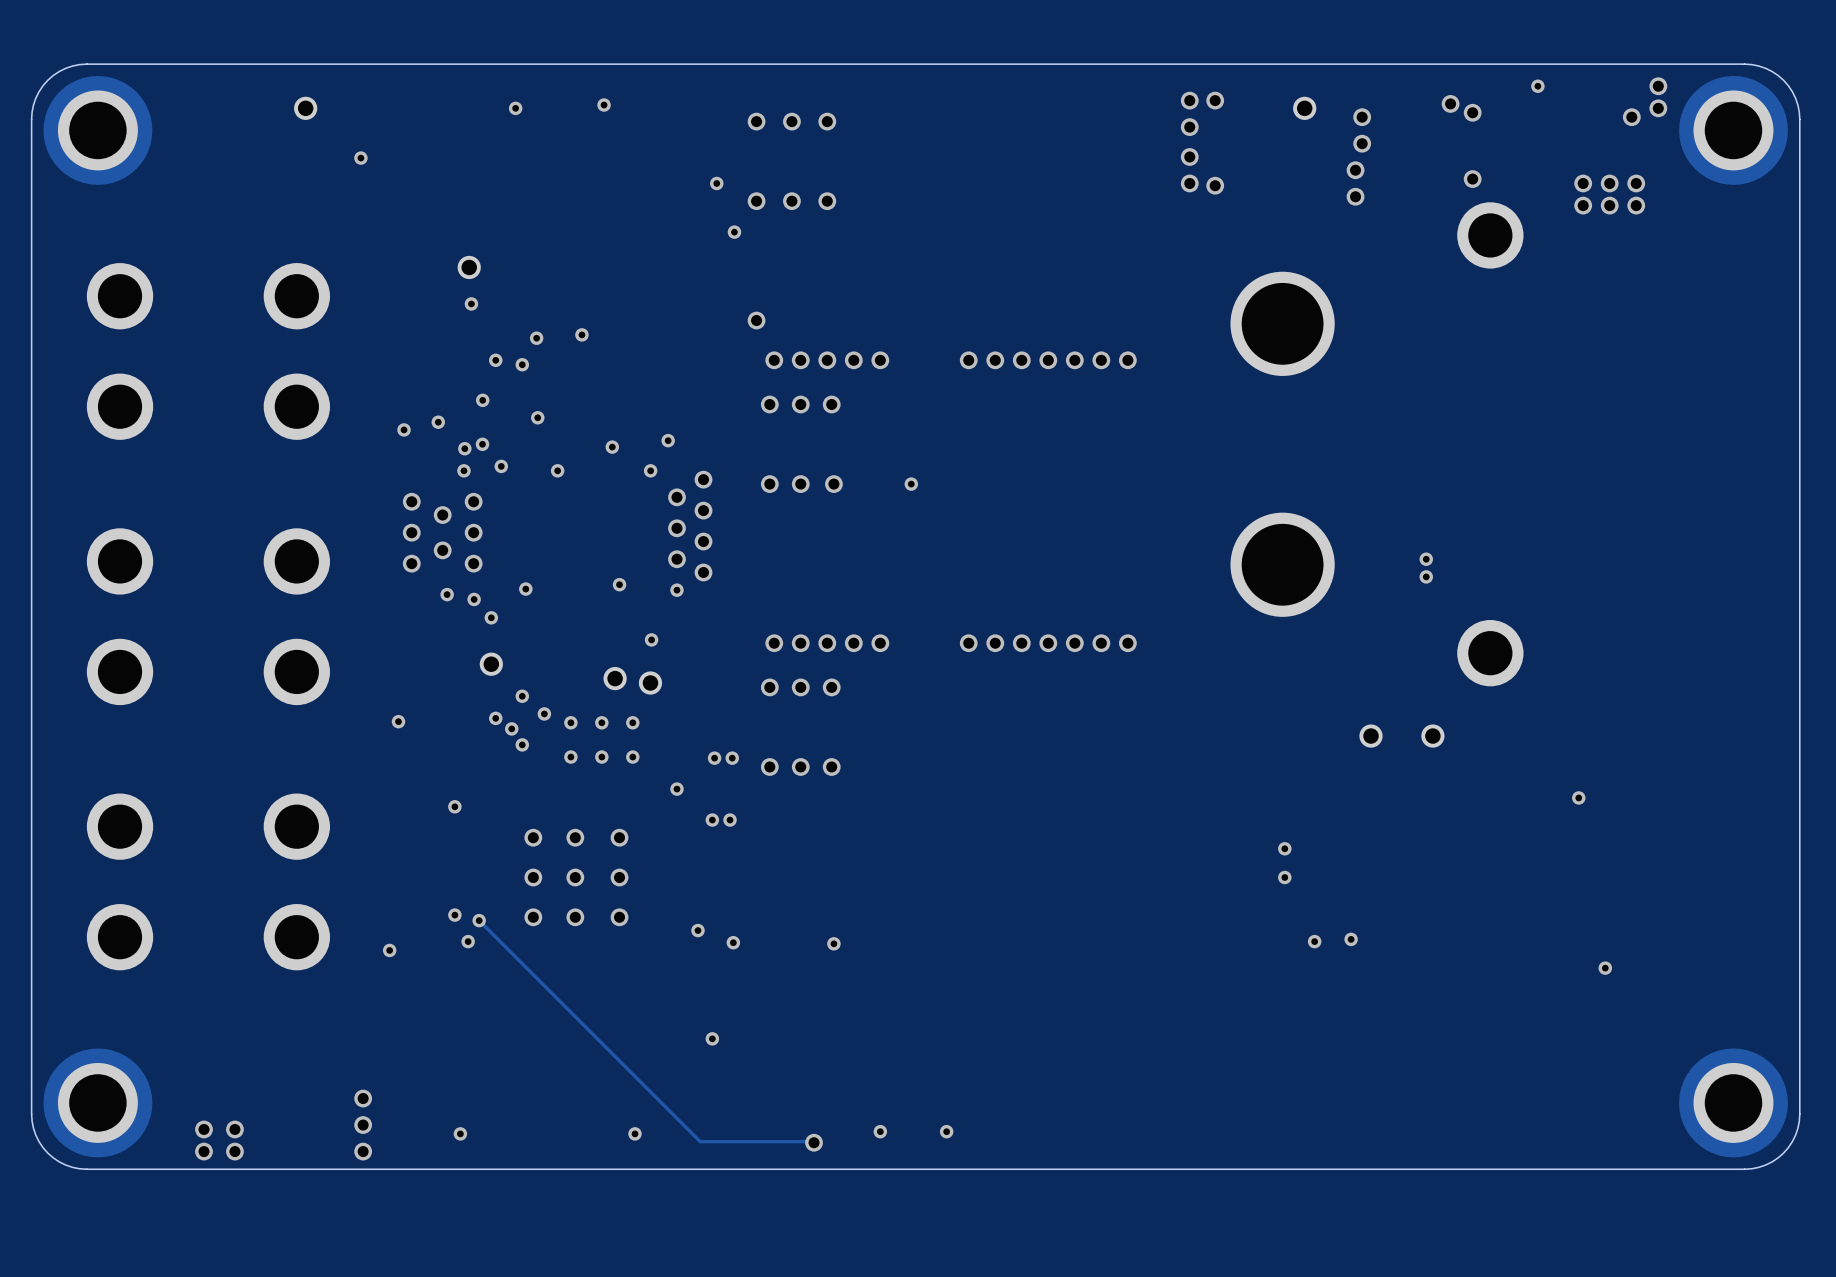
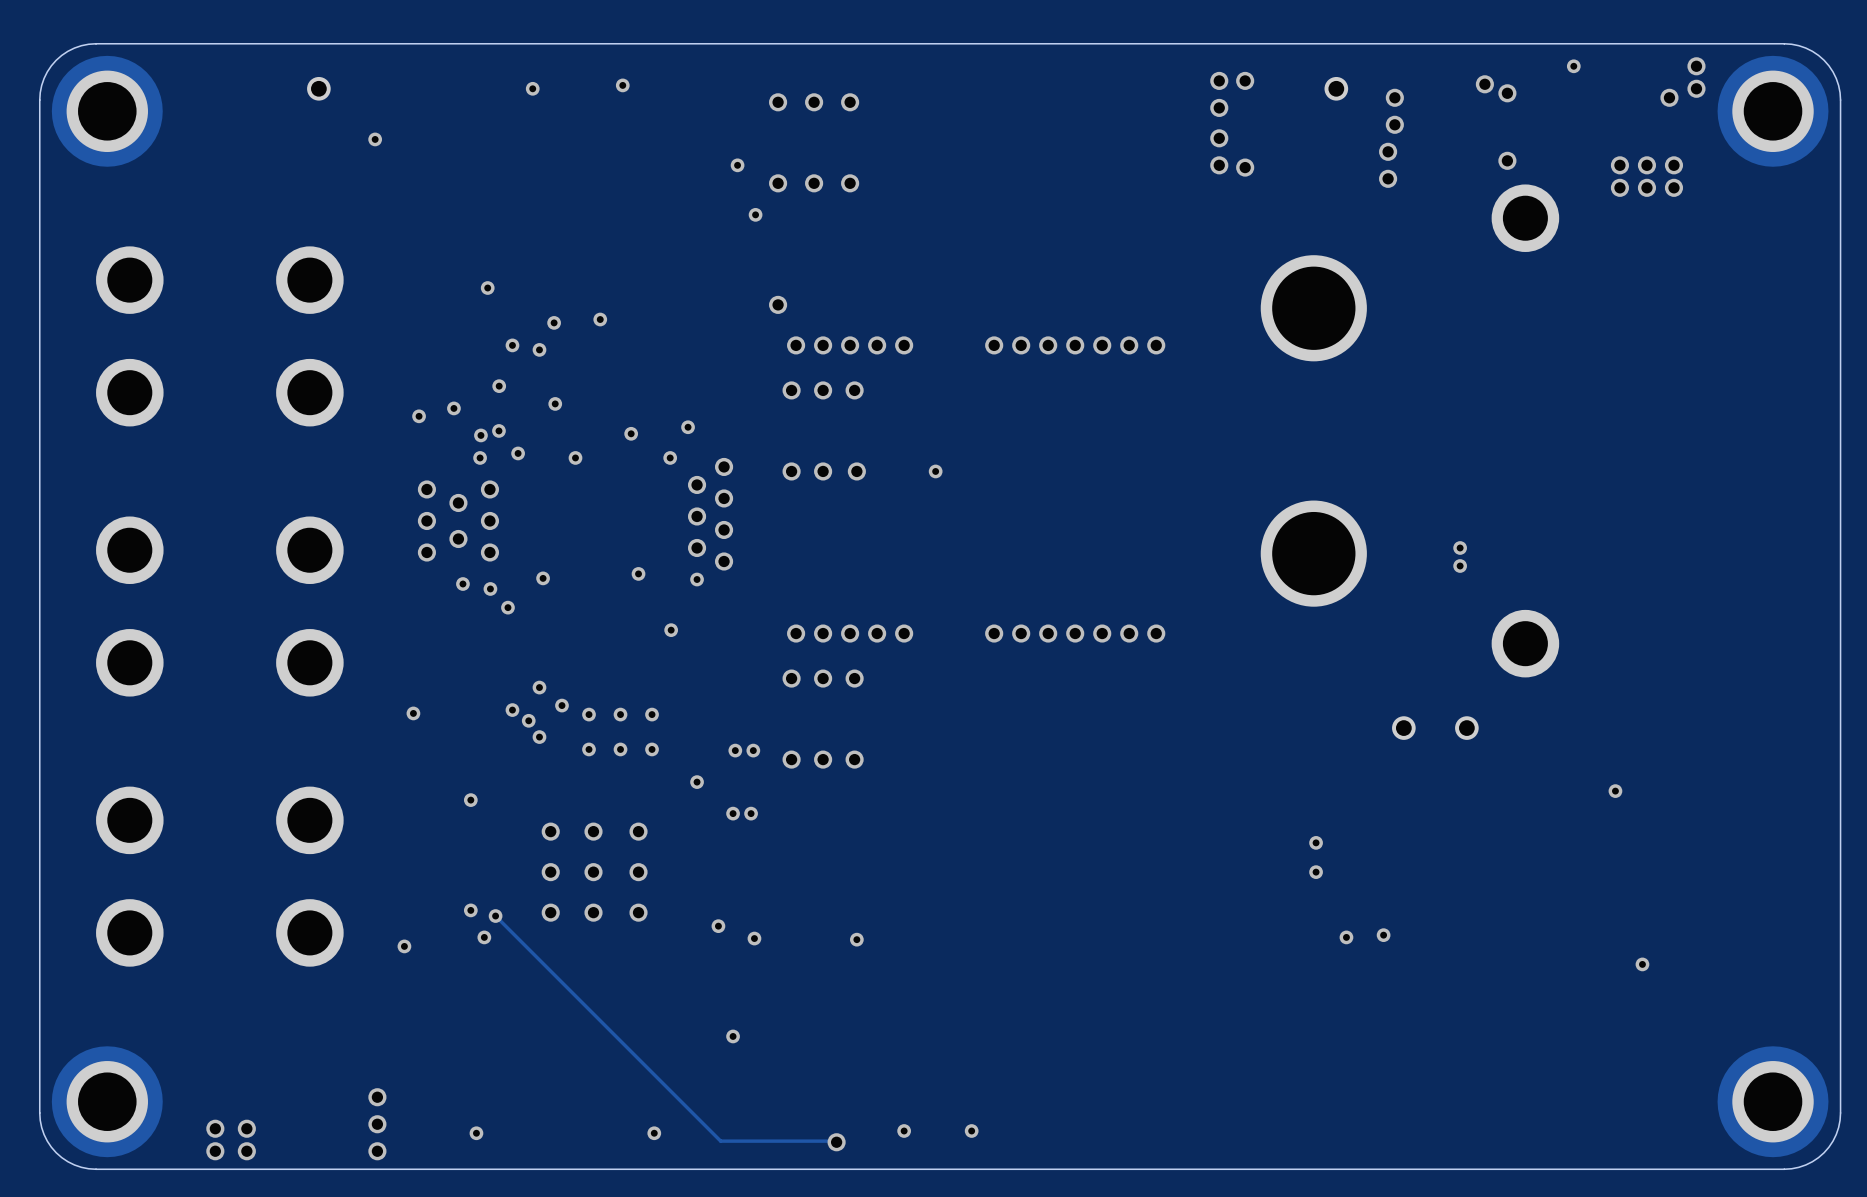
part: (469, 267) -> none
part: (491, 664) -> none
part: (615, 678) -> none
part: (650, 683) -> none

